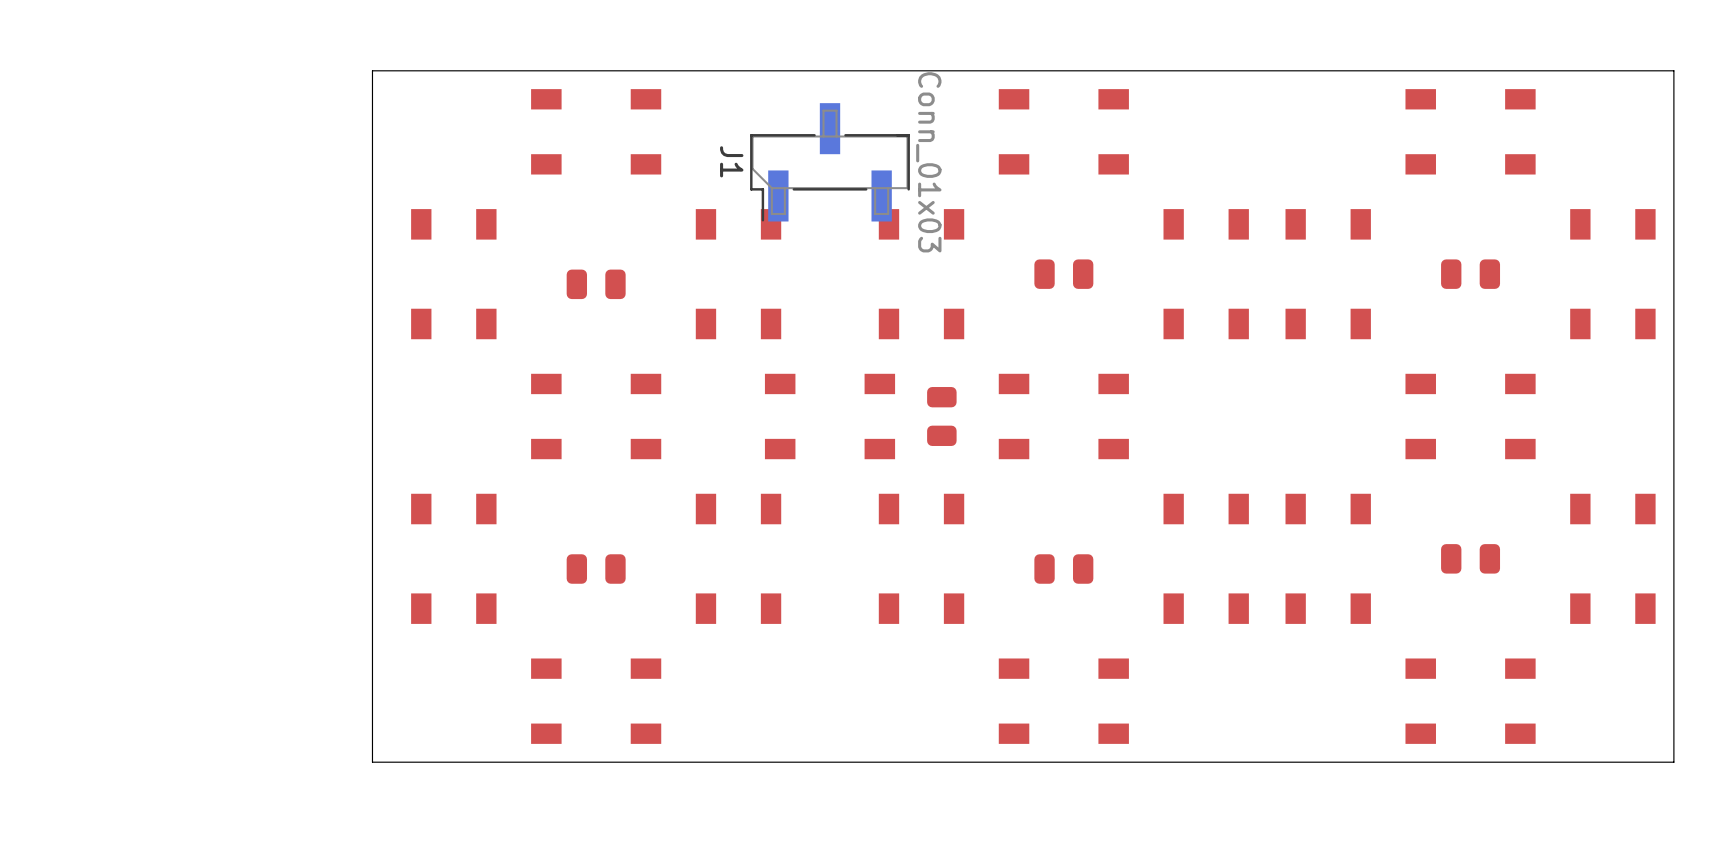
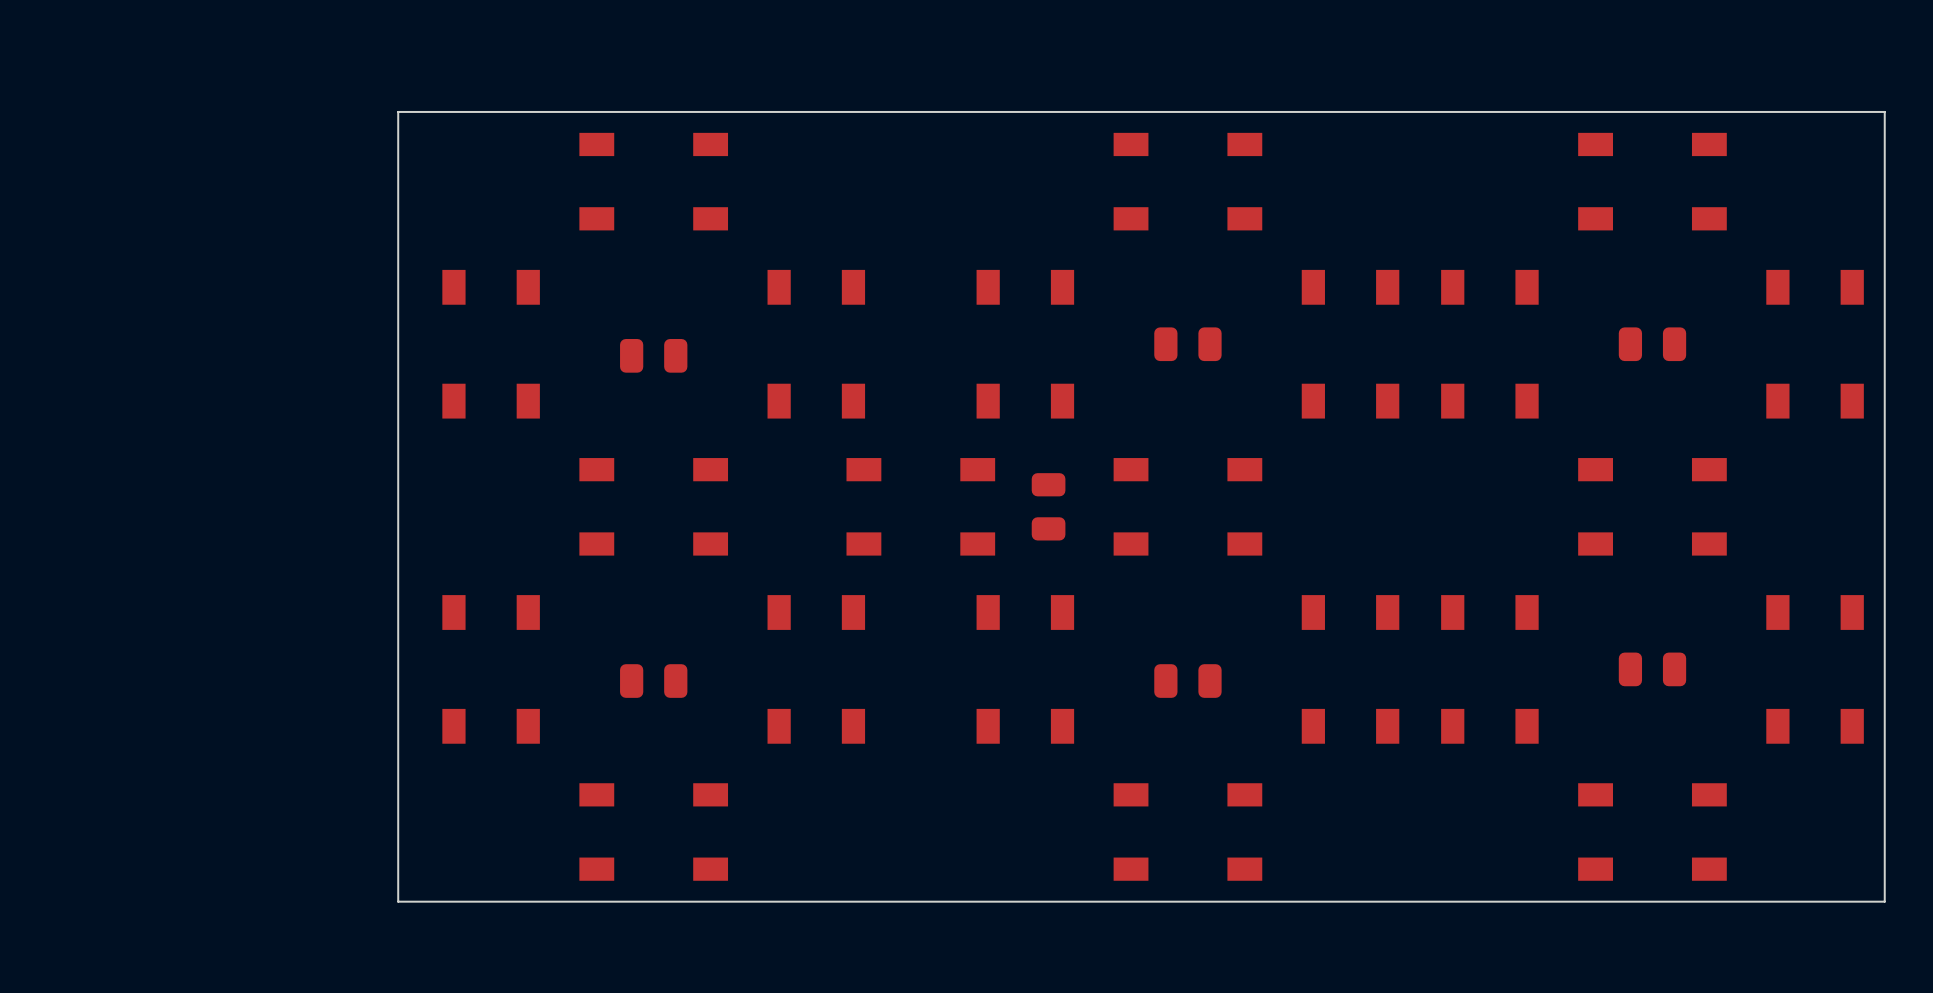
J1: Conn_01x03 (830, 162) -> none

